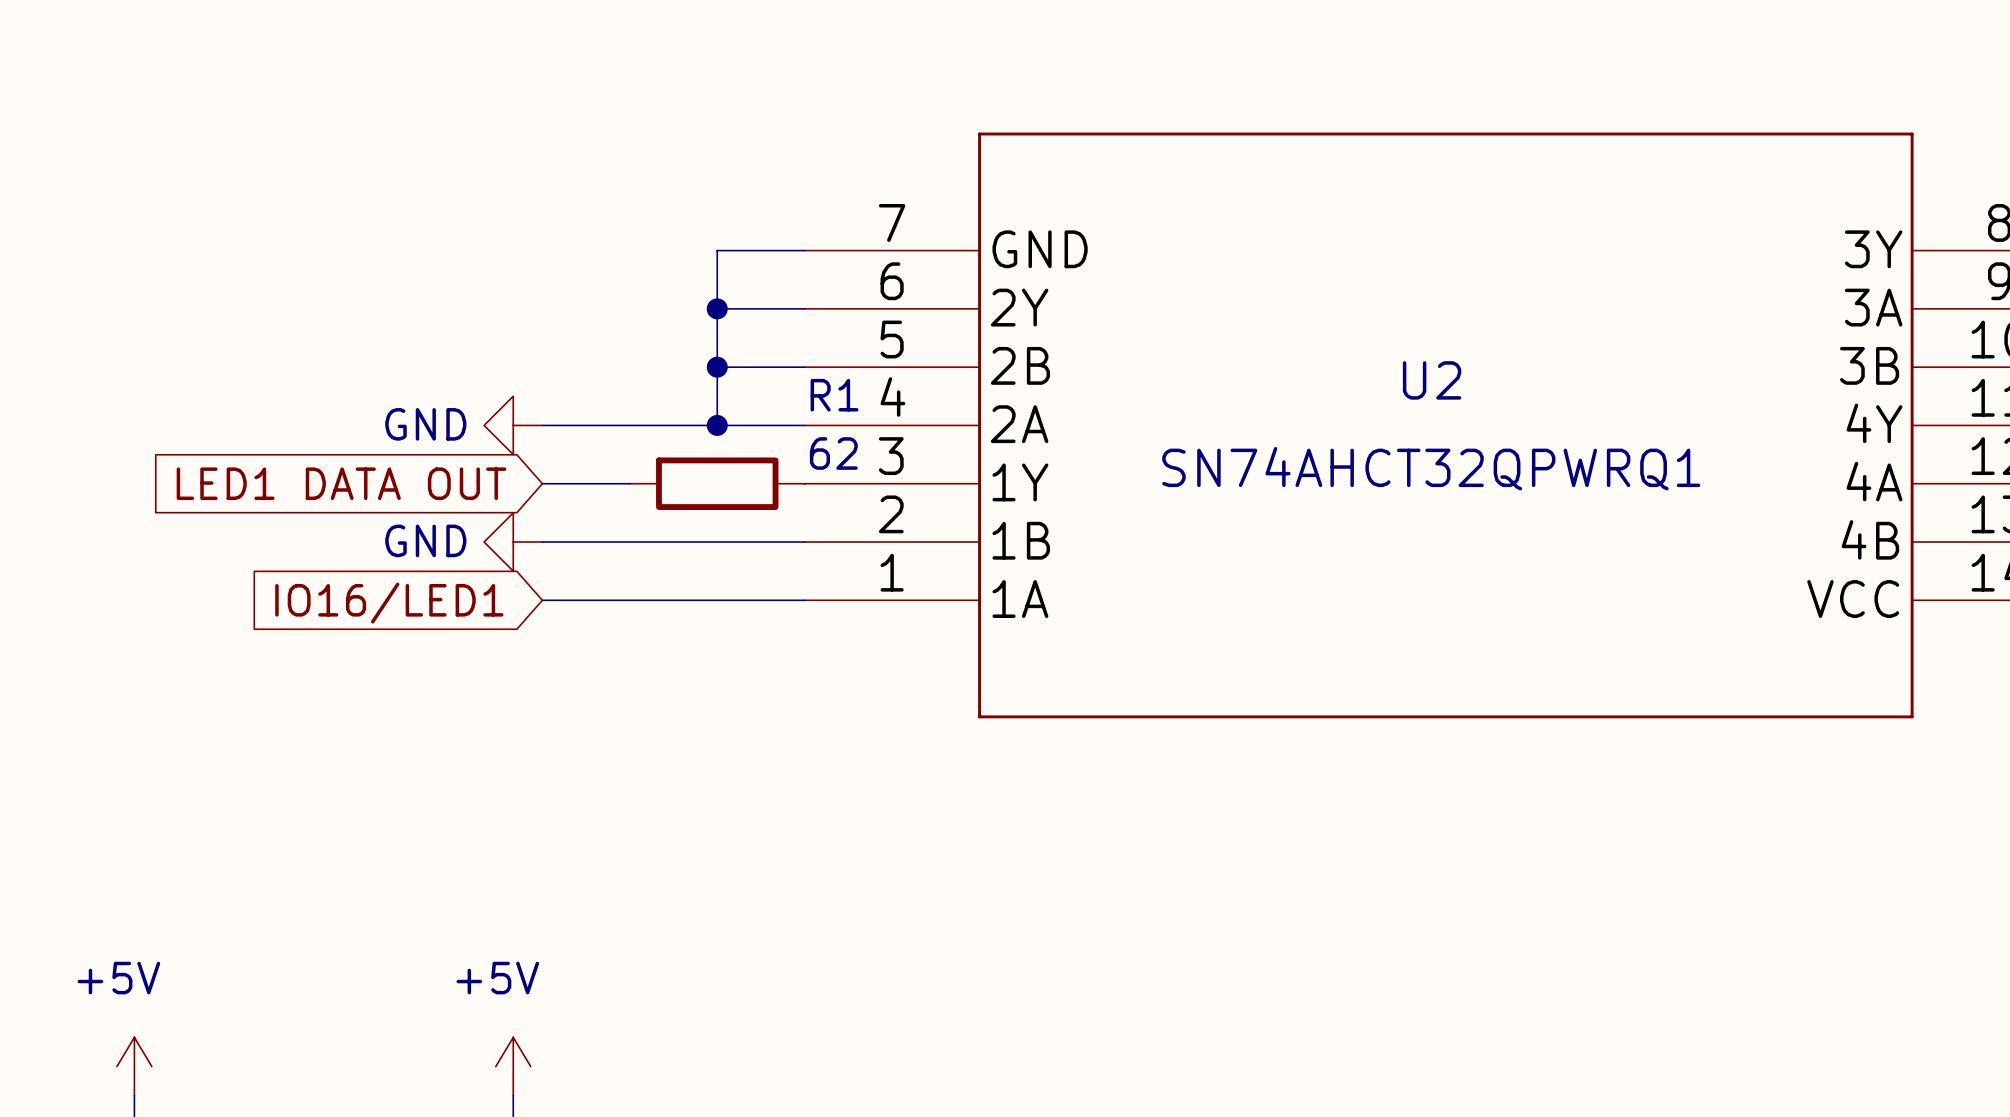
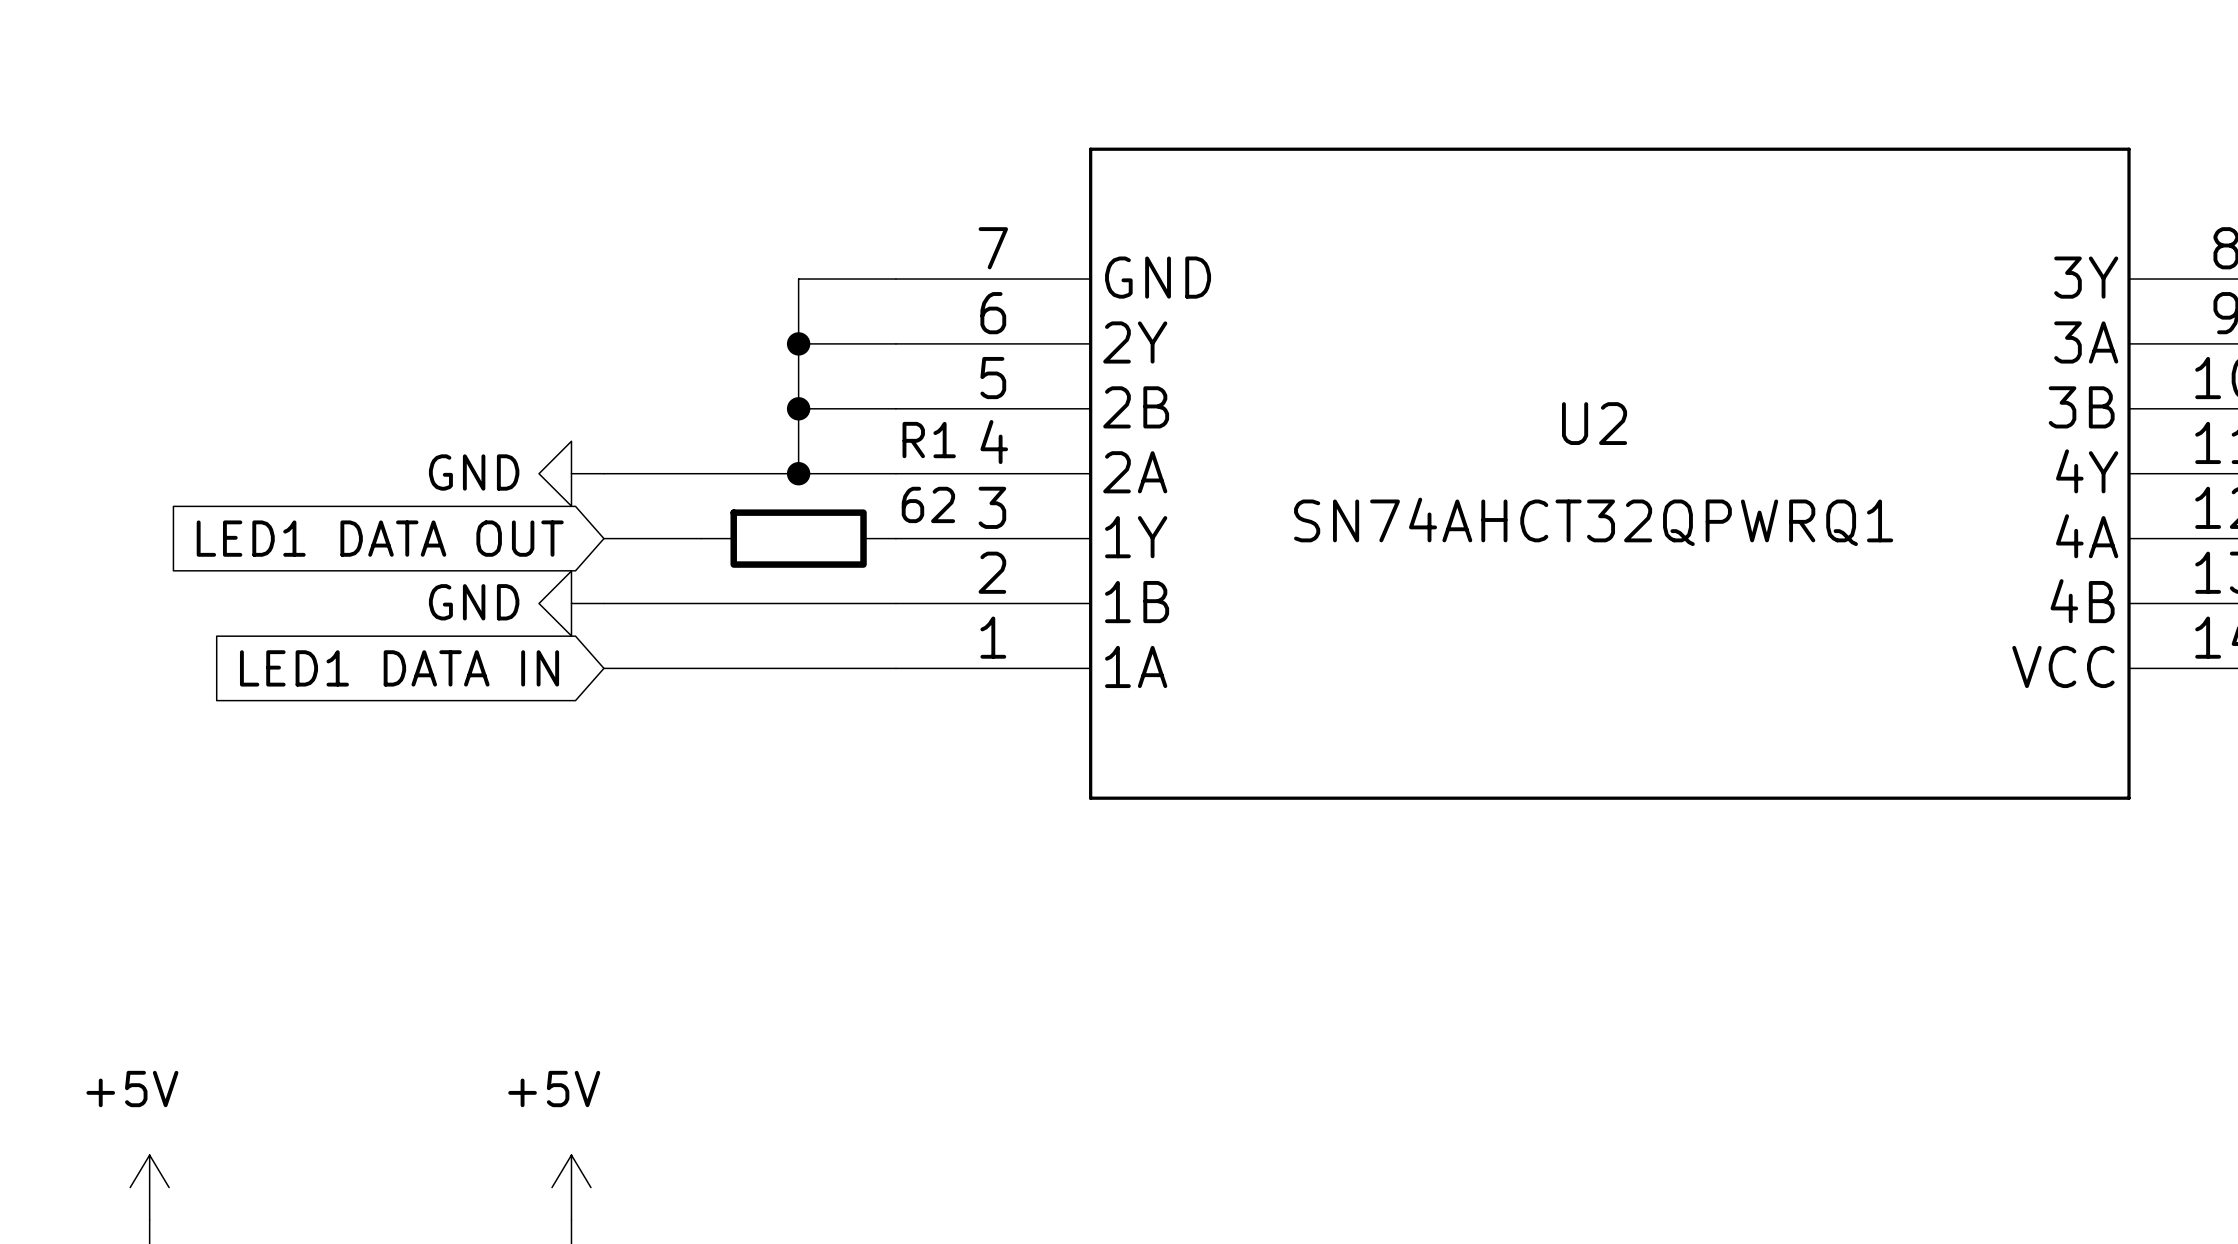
global label: IO16/LED1 (389, 603) -> LED1 DATA IN (399, 668)

